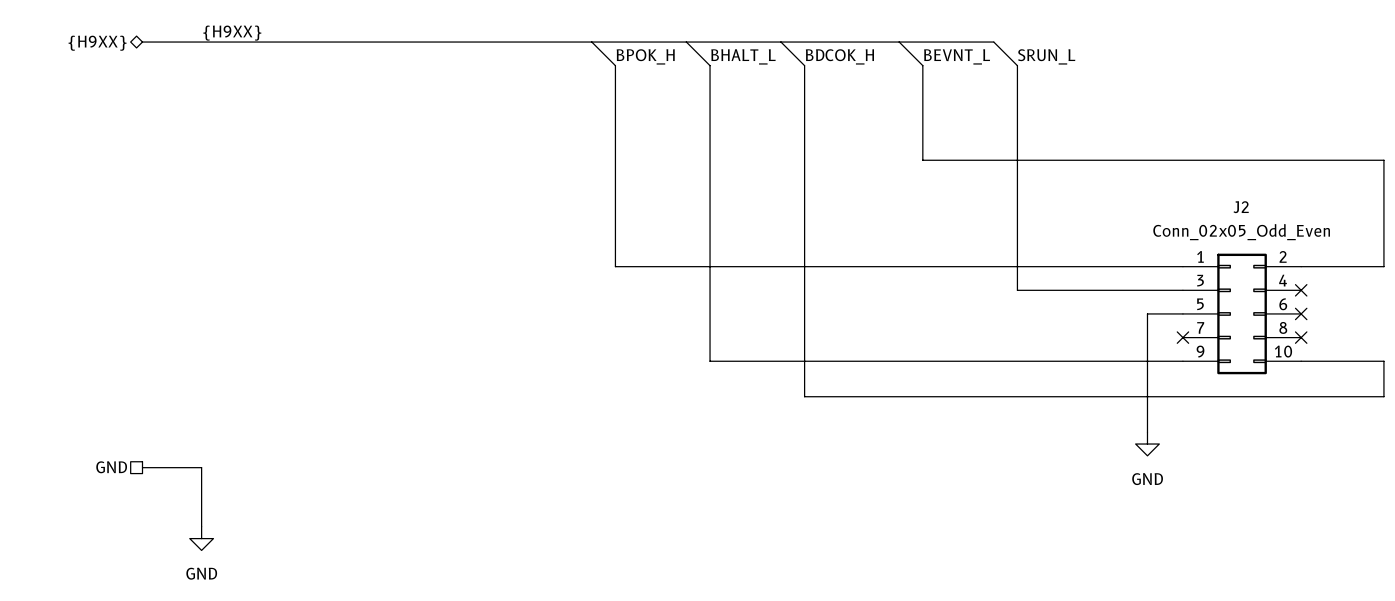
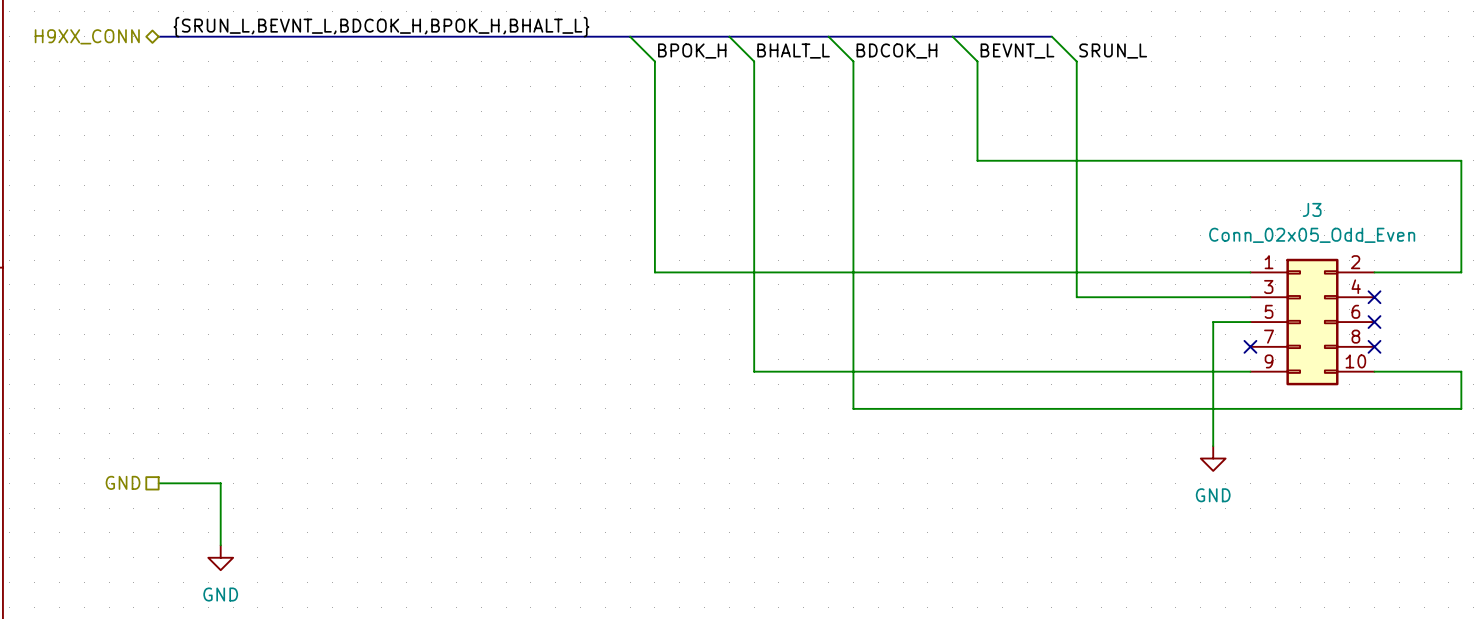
label: {H9XX} (232, 33) -> none
label: none -> {SRUN_L,BEVNT_L,BDCOK_H,BPOK_H,BHALT_L} (381, 27)
hierarchical label: {H9XX} (97, 43) -> H9XX_CONN (87, 36)
J2 name: J2 (1241, 207) -> J3 (1312, 209)

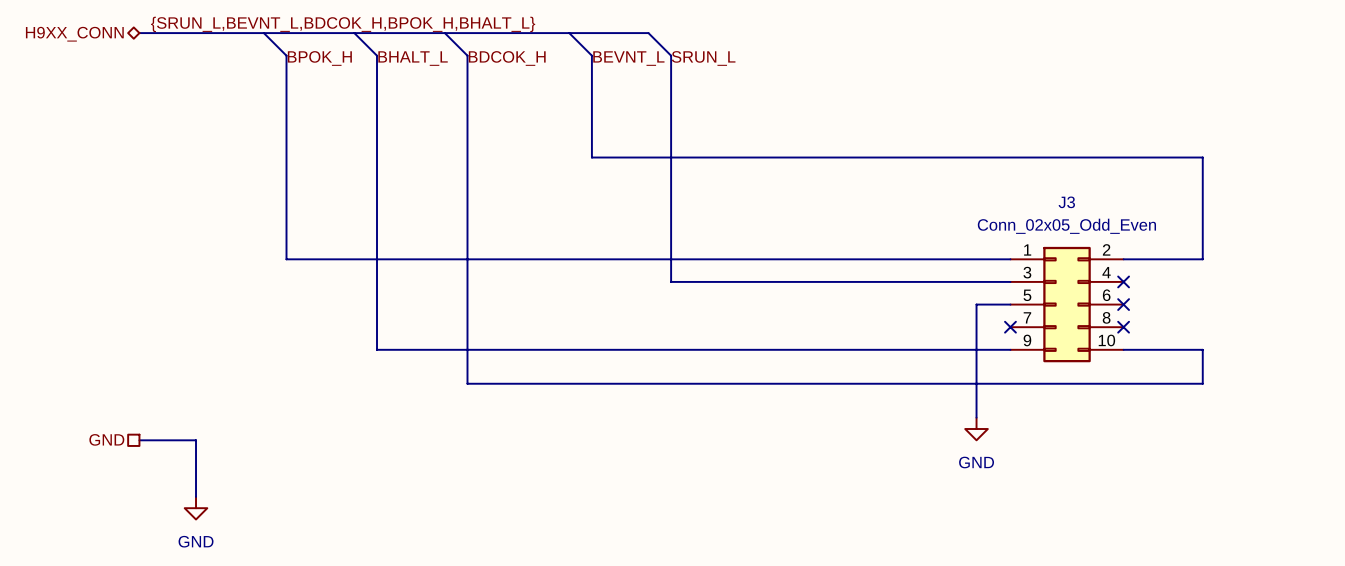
wire: none -> (263, 33) (286, 55) (286, 259) (1010, 259)
wire: none -> (354, 33) (377, 55) (377, 349) (1010, 349)
wire: none -> (444, 33) (467, 55) (467, 383) (1202, 383) (1202, 349) (1123, 349)
wire: none -> (648, 33) (671, 55) (671, 281) (1010, 281)
bus: (716, 36) (1051, 36) -> none
wire: (729, 36) (754, 61) (754, 371) (1250, 371) -> none
wire: (828, 36) (853, 61) (853, 408) (1461, 408) (1461, 371) (1374, 371) -> none
wire: (952, 36) (977, 61) (977, 160) (1461, 160) (1461, 272) (1374, 272) -> none
wire: (1051, 36) (1076, 61) (1076, 297) (1250, 297) -> none
label: BPOK_H (692, 51) -> none
label: BHALT_L (793, 51) -> none
label: BDCOK_H (896, 51) -> none
label: BEVNT_L (1017, 51) -> none
label: SRUN_L (1113, 51) -> none
label: none -> BPOK_H (319, 58)
label: none -> BHALT_L (413, 58)
label: none -> BDCOK_H (507, 58)
label: none -> BEVNT_L (628, 58)
label: none -> SRUN_L (703, 58)
wire: (654, 173) (654, 272) (1250, 272) -> (591, 157) (1202, 157) (1202, 259) (1123, 259)
no-connect mark: (1374, 297) -> none
no-connect mark: none -> (1123, 281)
wire: (1250, 322) (1213, 322) (1213, 446) -> (1010, 304) (976, 304) (976, 417)
J3 position: (1312, 322) -> (1067, 304)
no-connect mark: (1374, 322) -> none
no-connect mark: none -> (1123, 304)
no-connect mark: (1250, 346) -> none
no-connect mark: (1374, 346) -> none
no-connect mark: none -> (1010, 327)
no-connect mark: none -> (1123, 327)
power symbol position: GND (1213, 458) -> GND (976, 429)

